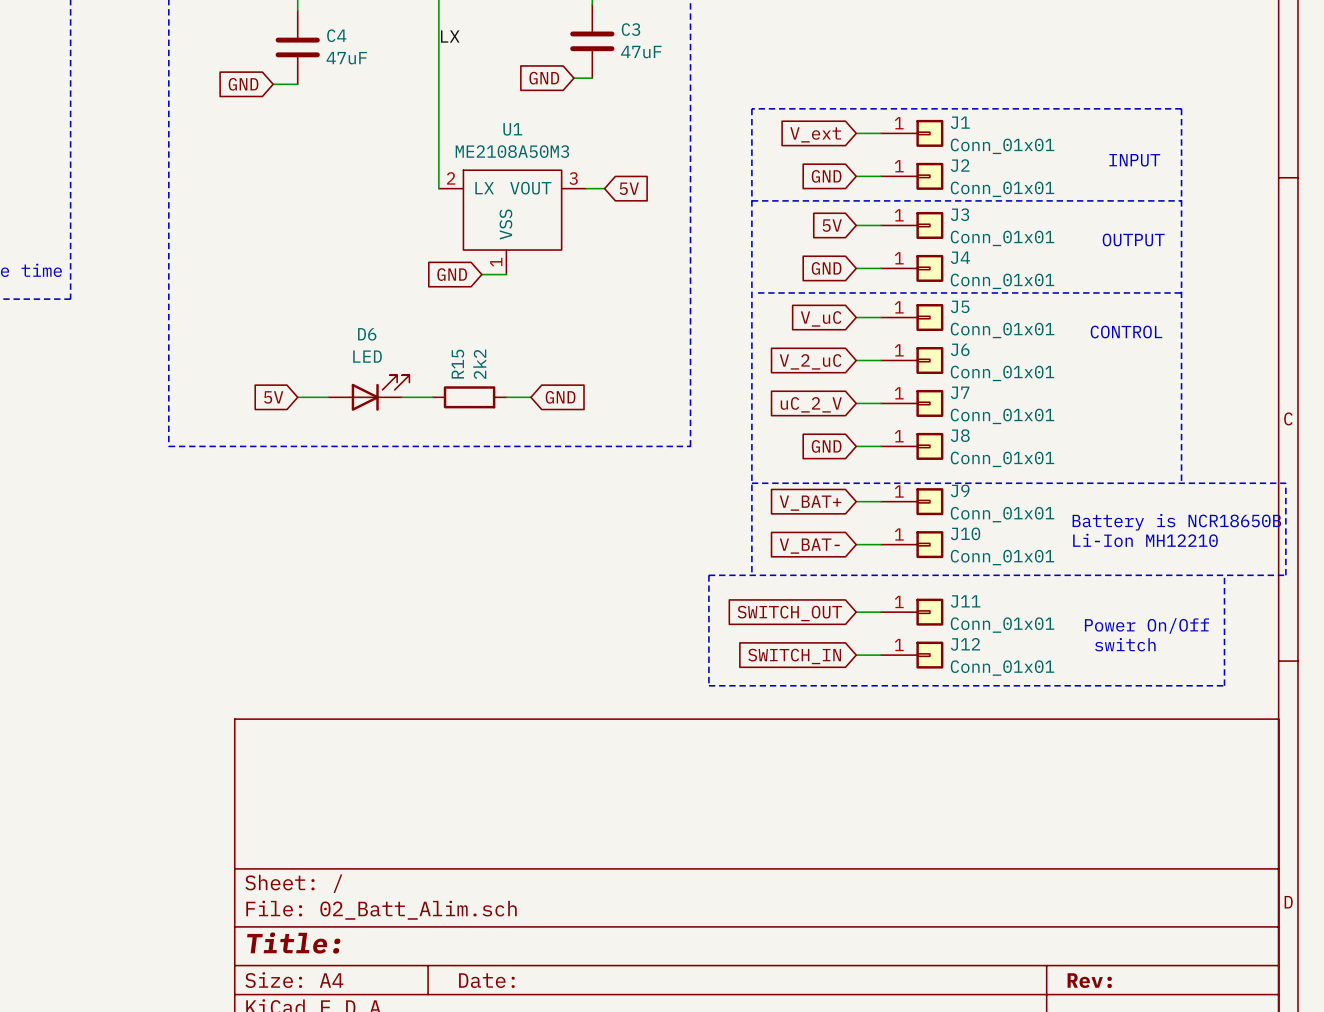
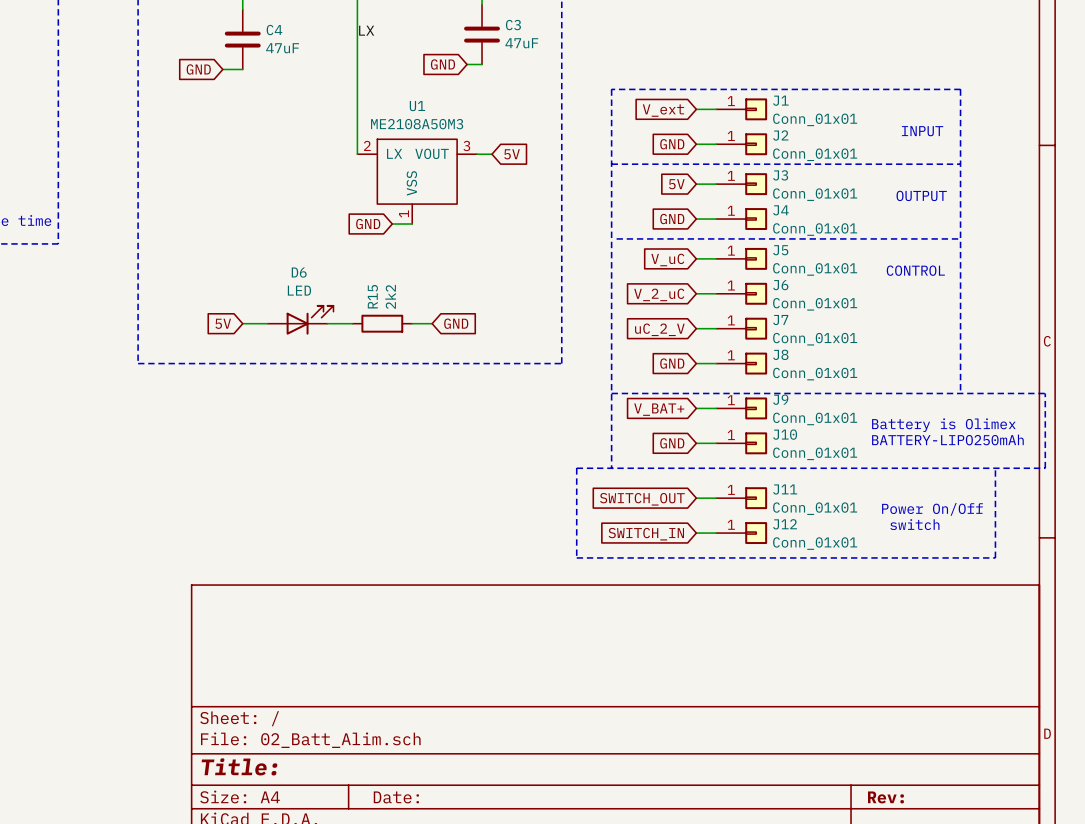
text: Battery is NCR18650B (1176, 522) -> Battery is Olimex (943, 425)
text: Li-Ion MH12210 (1145, 540) -> BATTERY-LIPO250mAh (947, 439)
global label: V_BAT- (809, 546) -> GND (672, 443)

